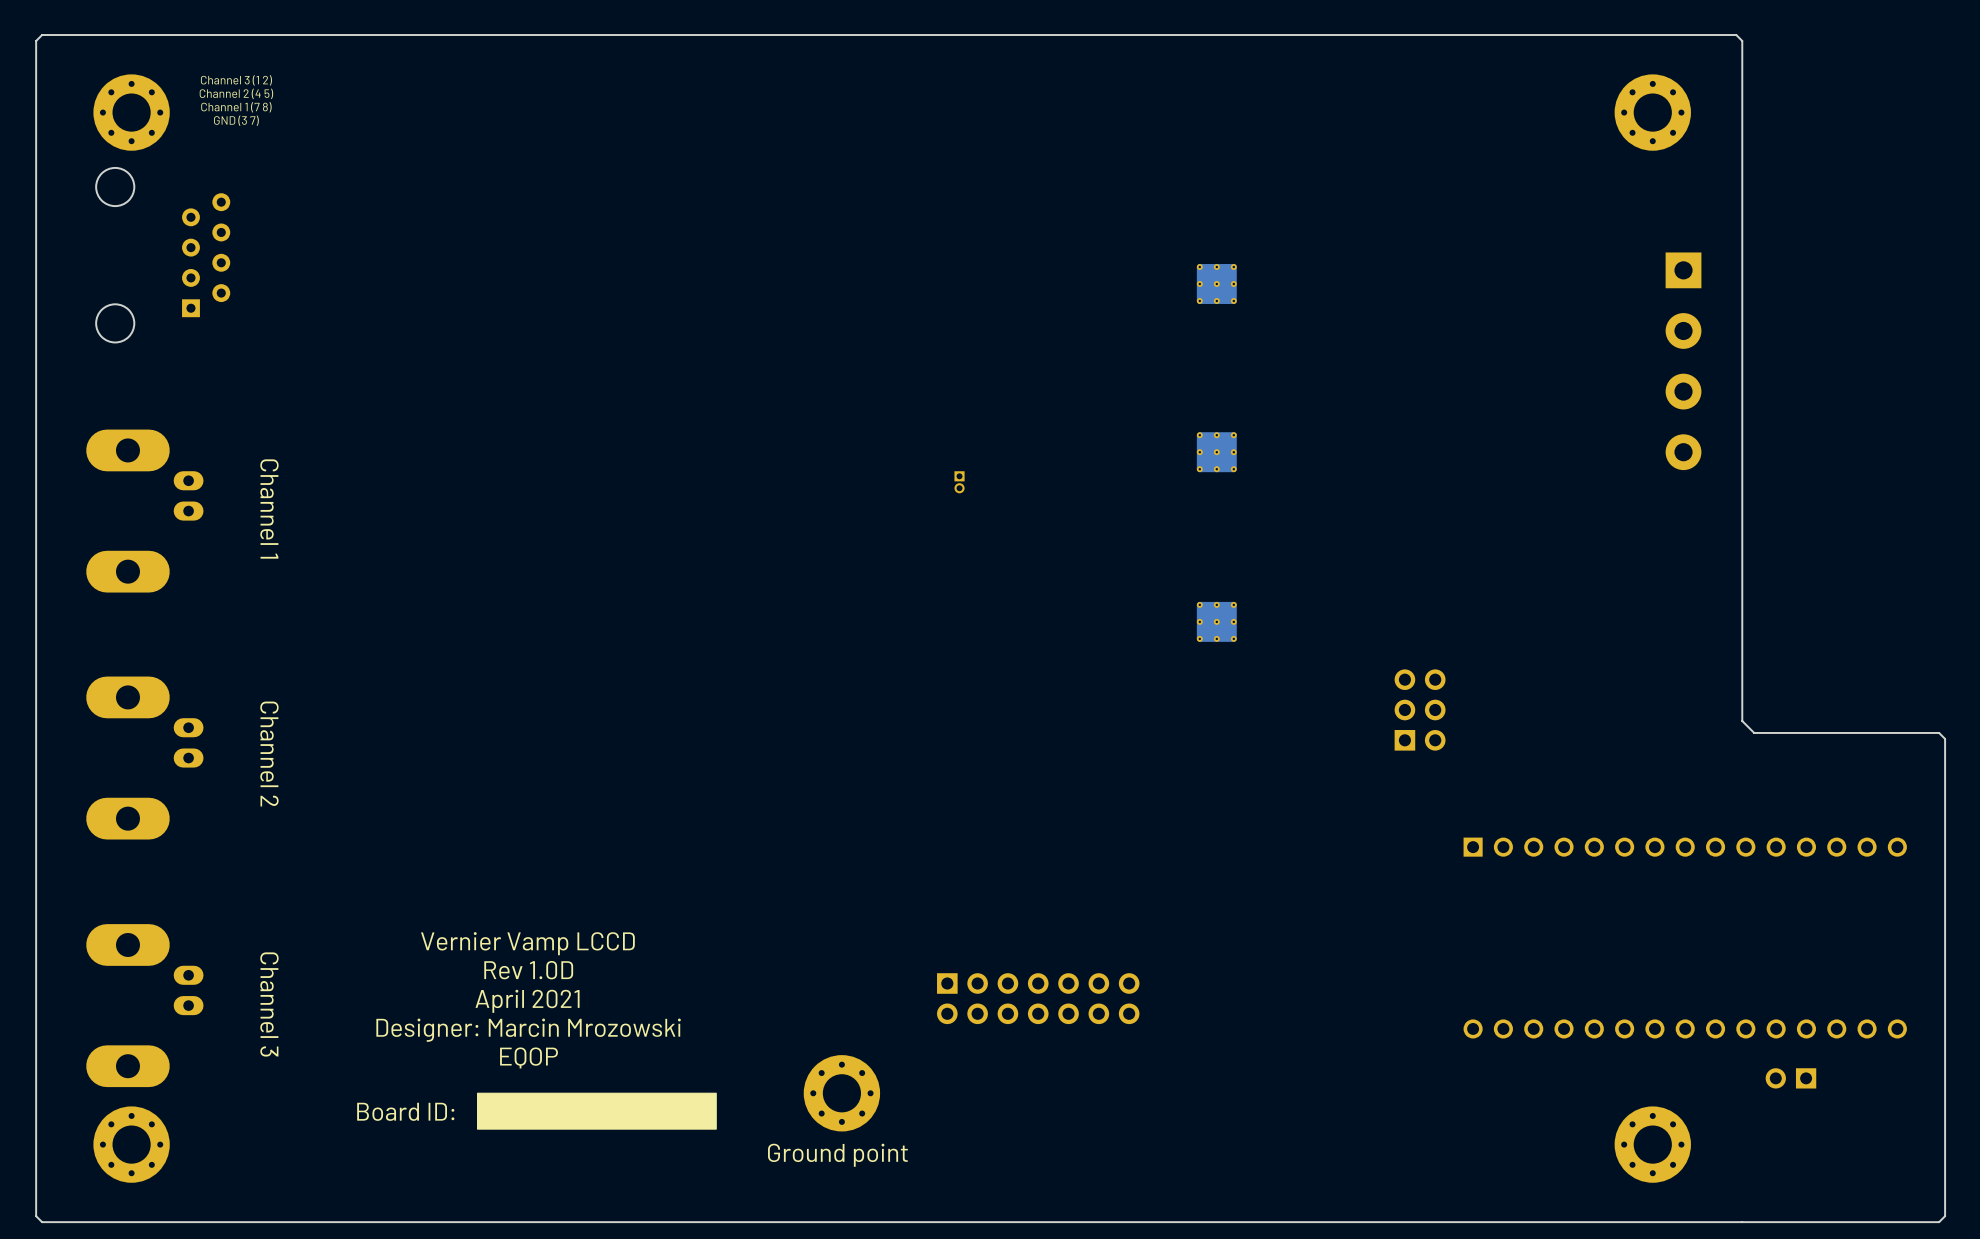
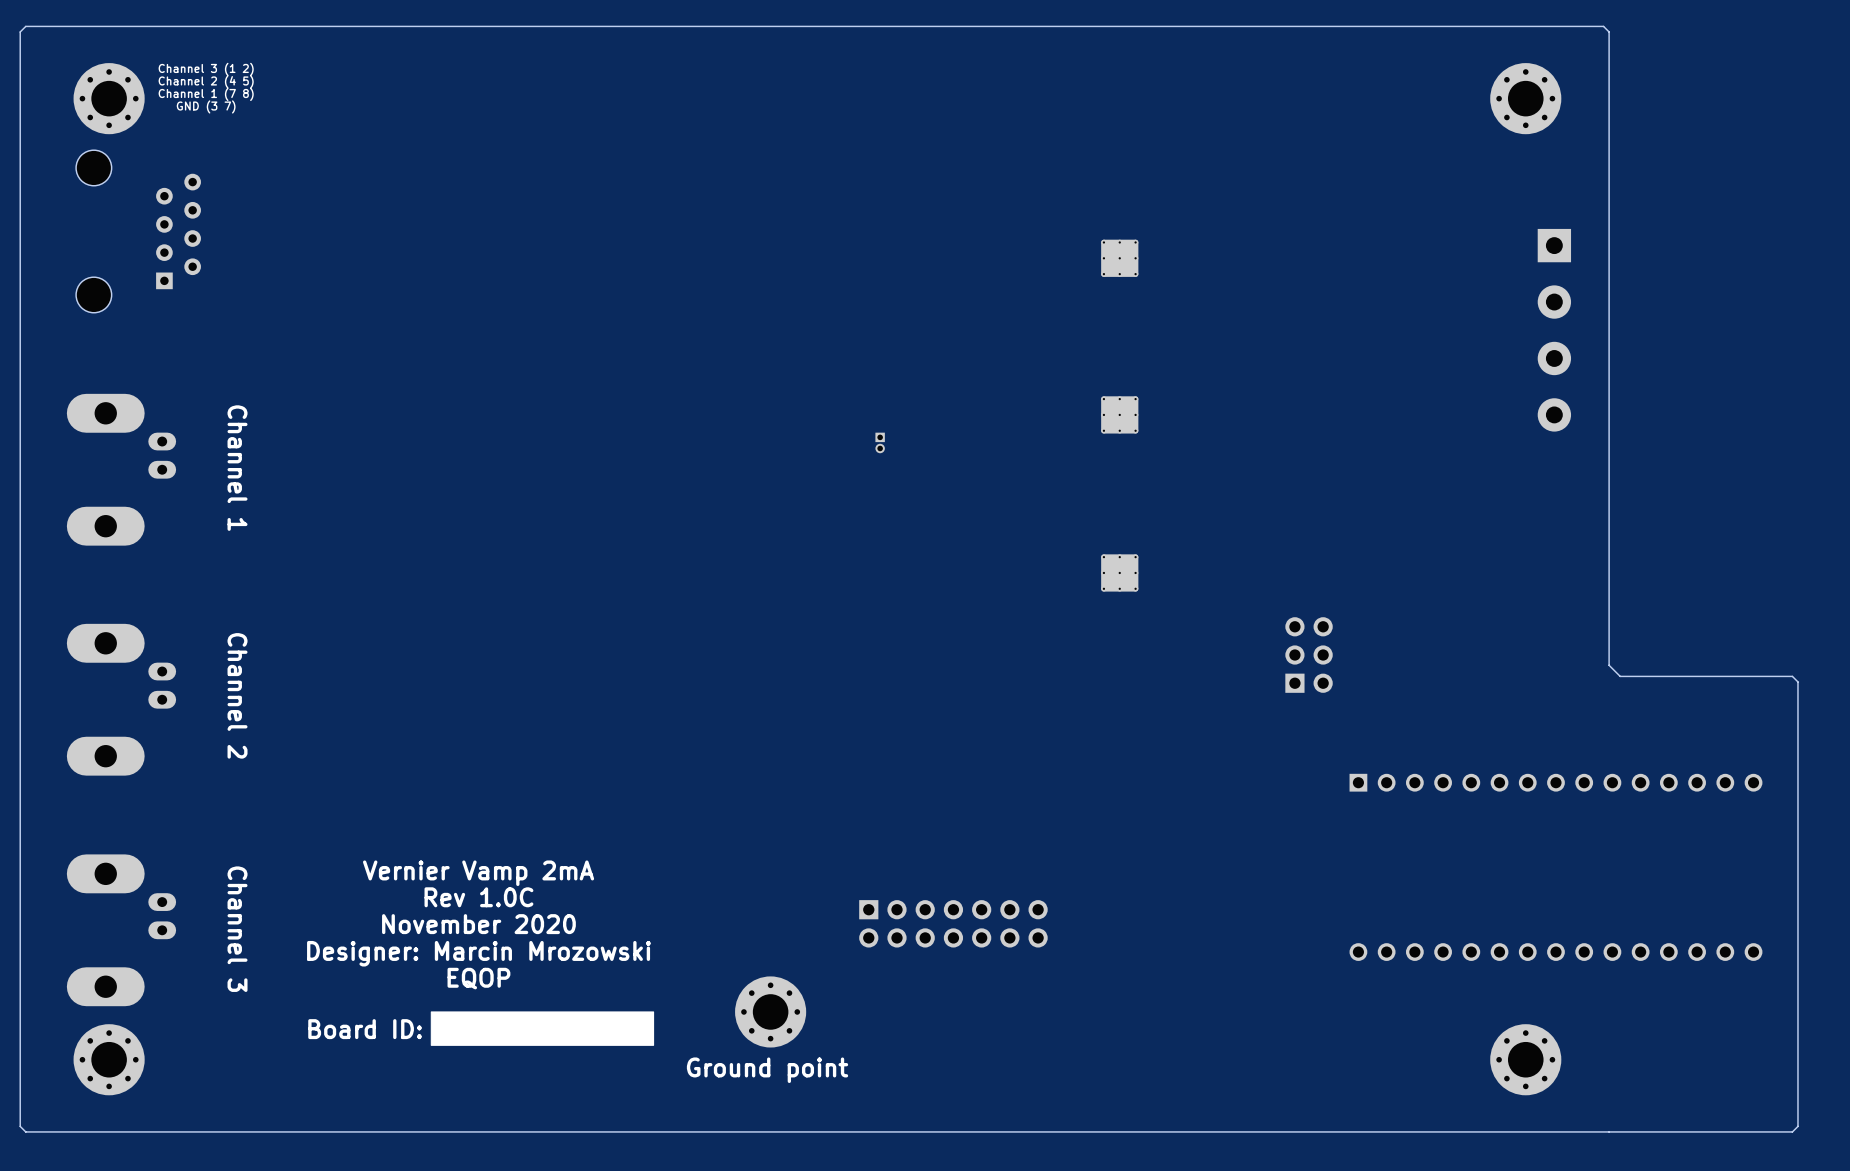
text: Vernier Vamp LCCD (527, 943) -> Vernier Vamp 2mA (478, 873)
text: Rev 1.0D (528, 970) -> Rev 1.0C (478, 897)
text: April 2021 (527, 1001) -> November 2020 (478, 924)
part: (1790, 1078) -> none

